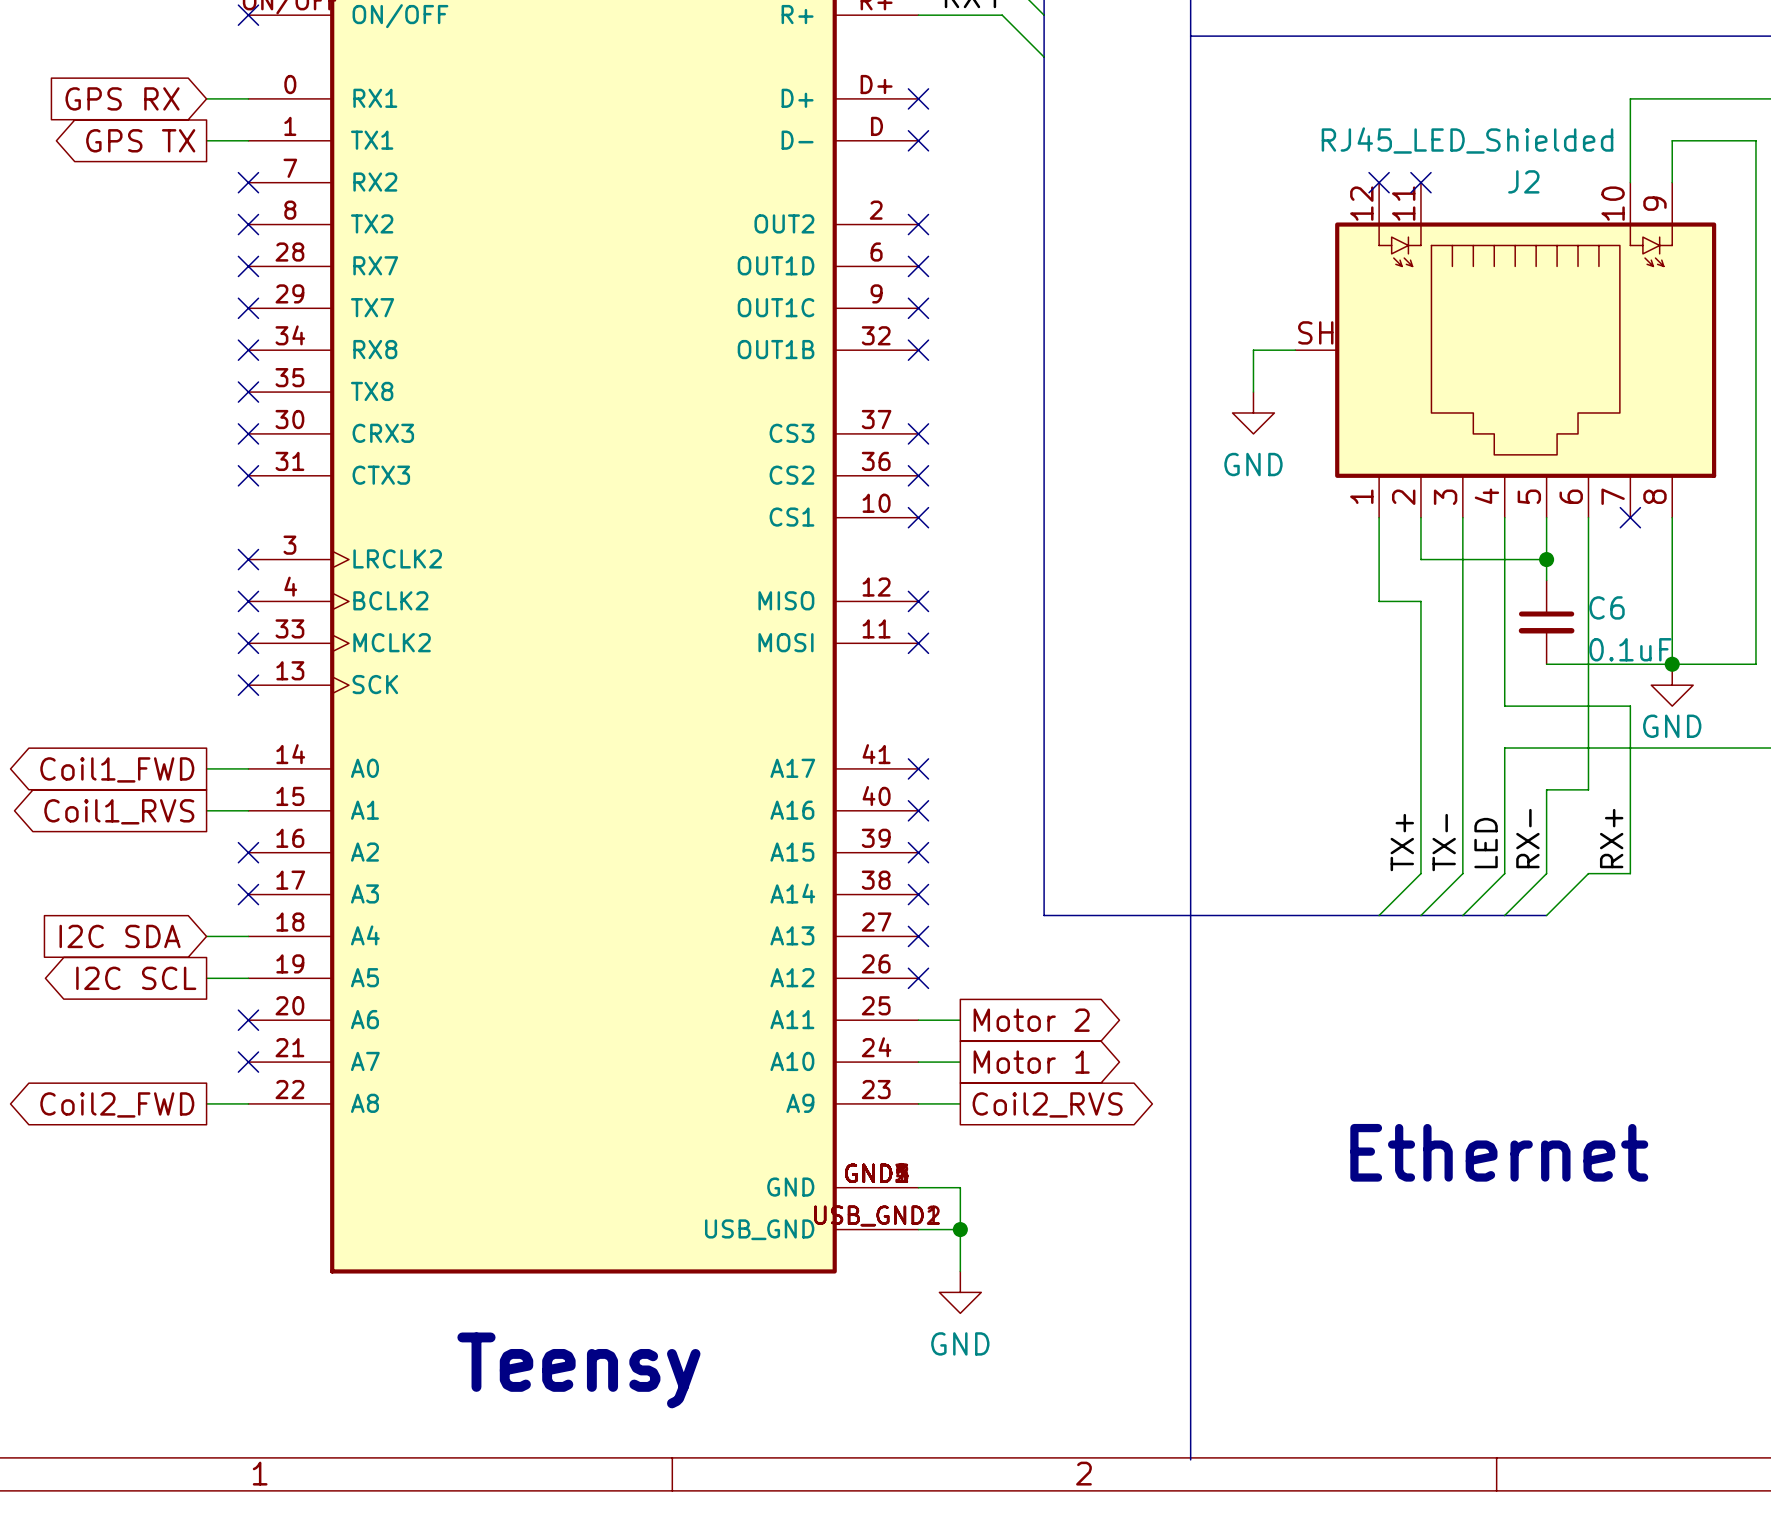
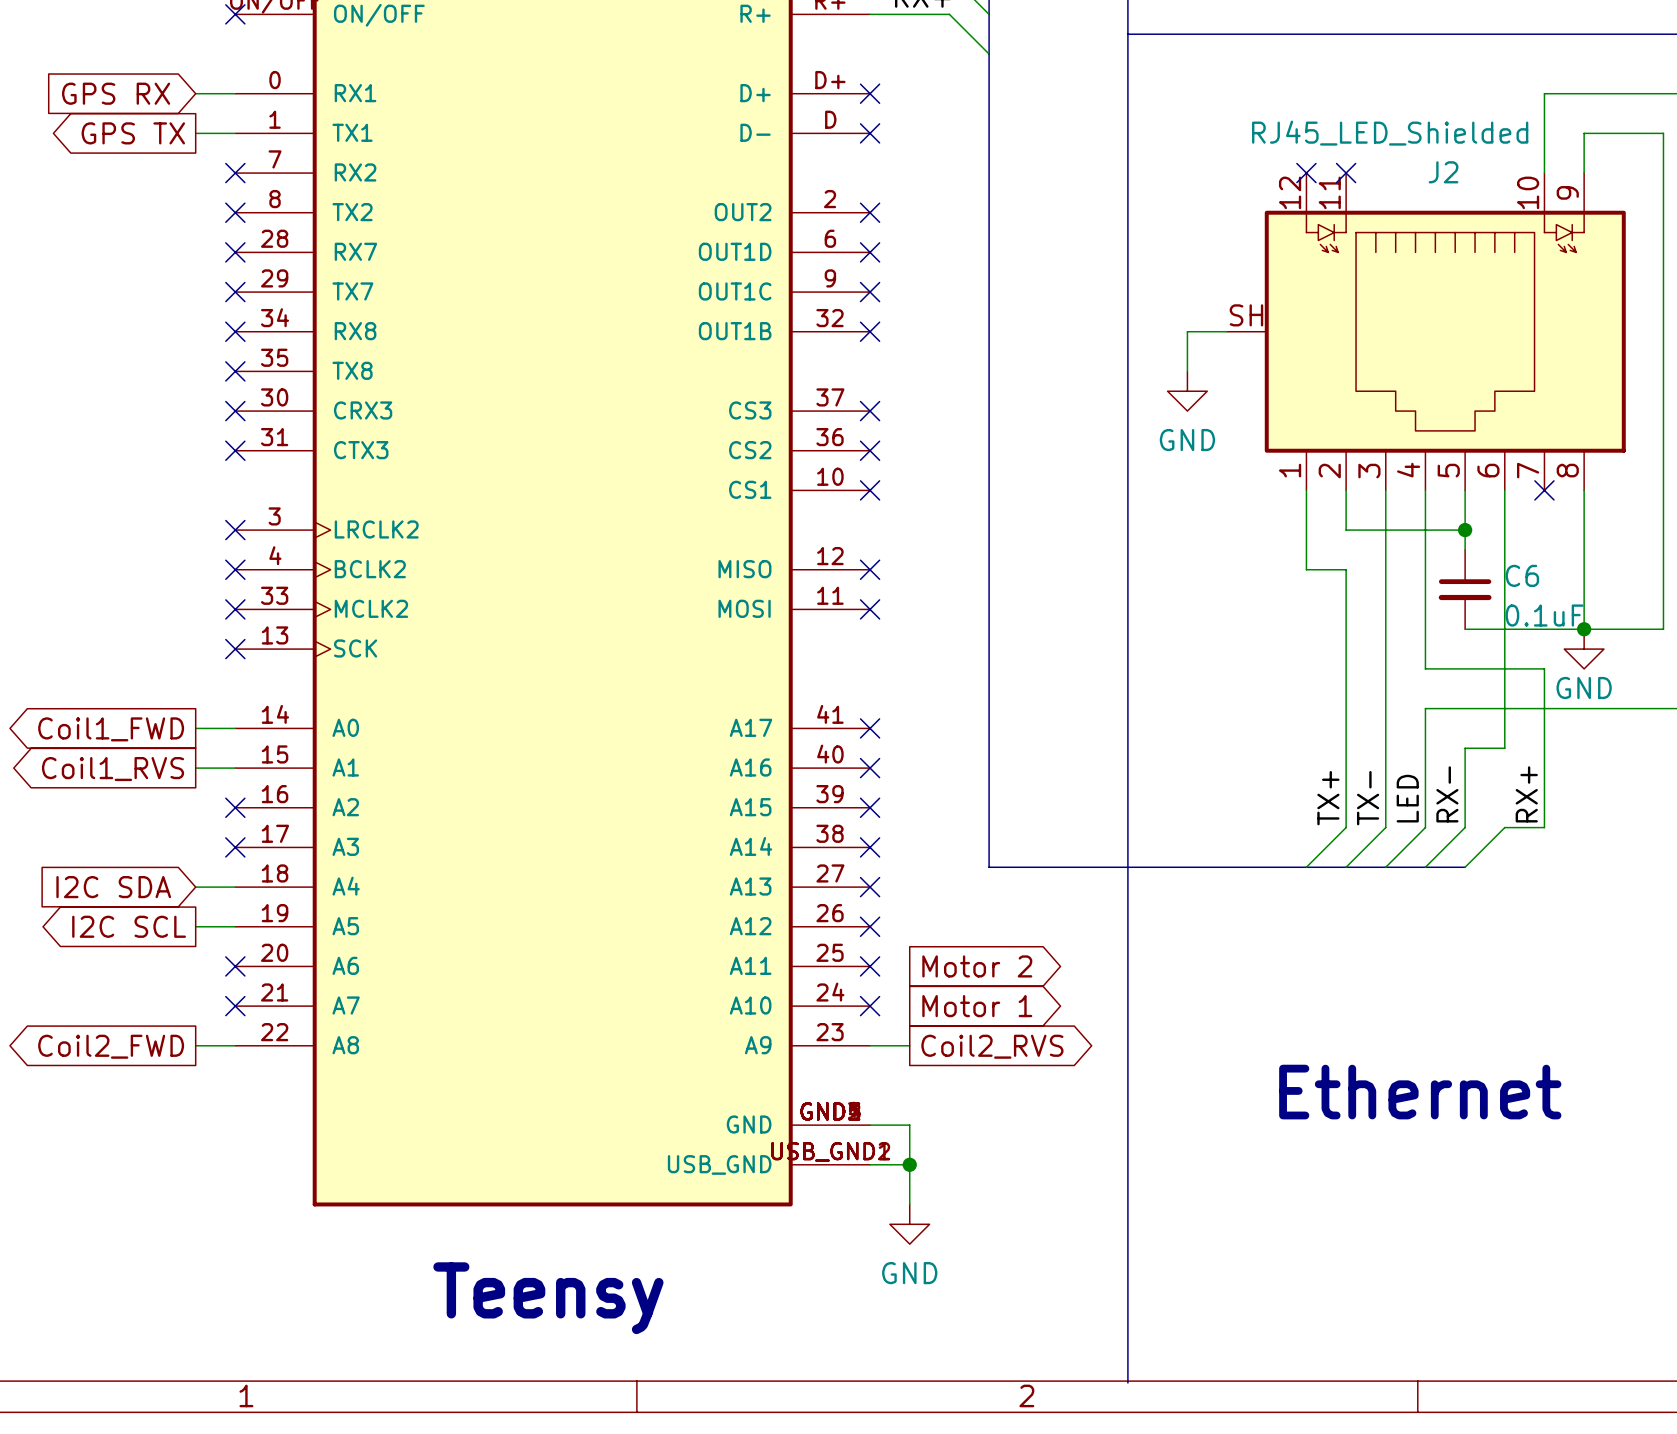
wire: (918, 1020) (960, 1020) -> none
no-connect mark: none -> (870, 966)
wire: (918, 1062) (960, 1062) -> none
no-connect mark: none -> (870, 1006)

